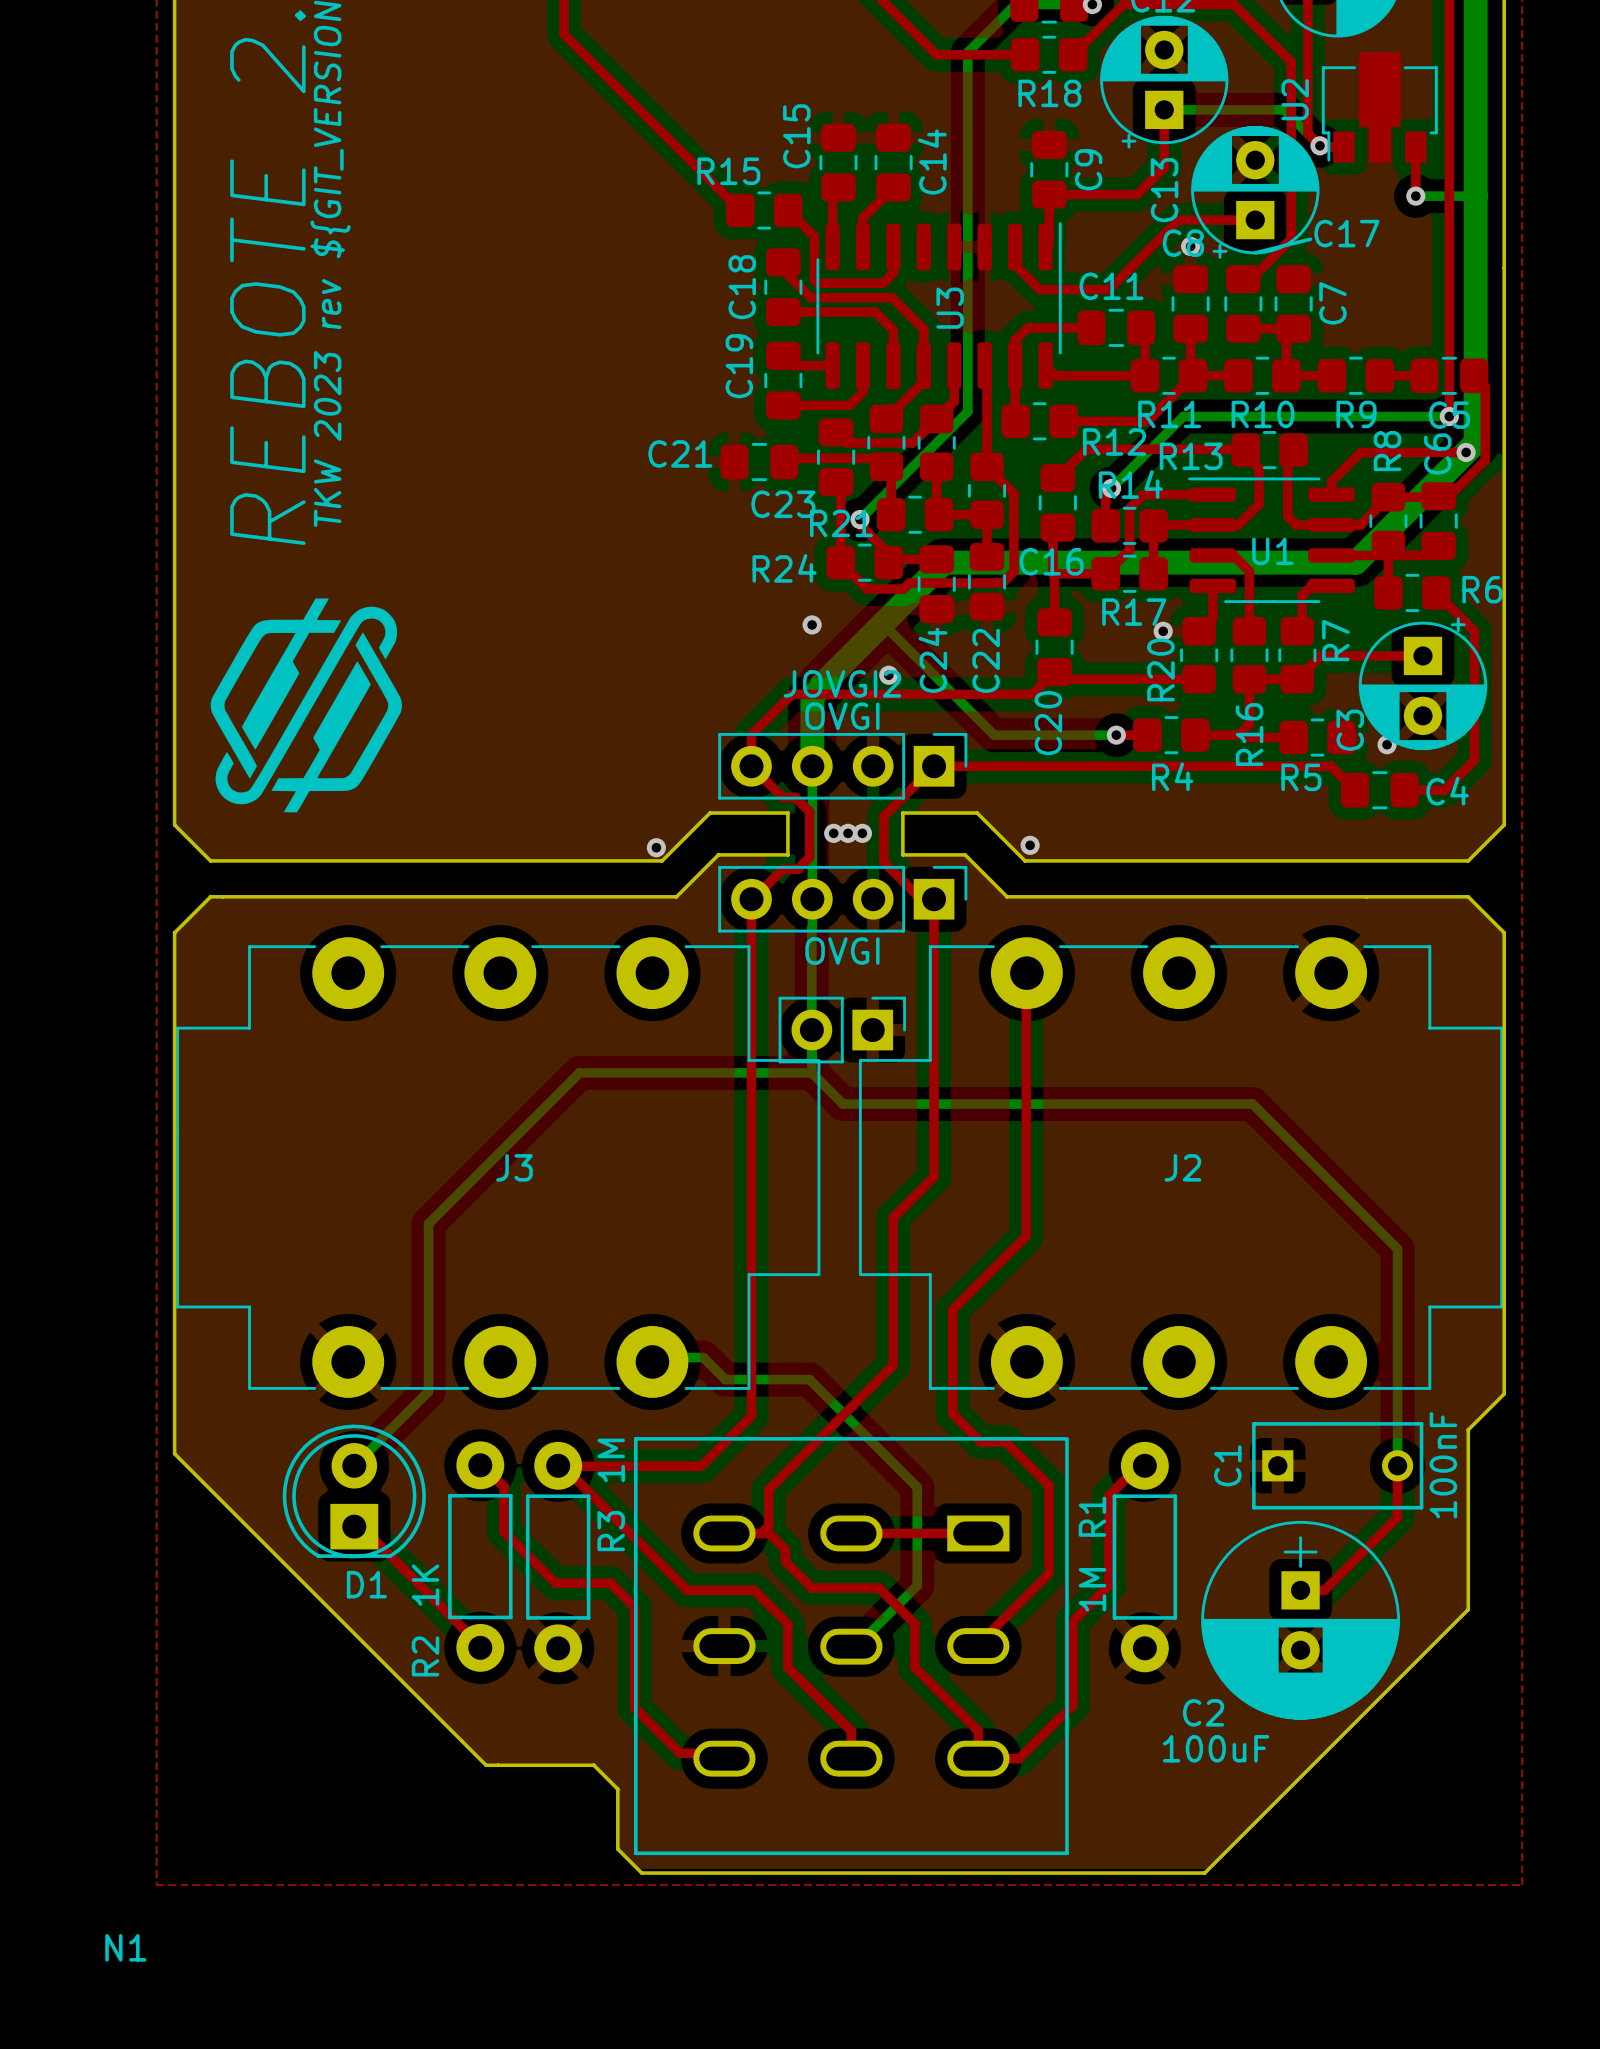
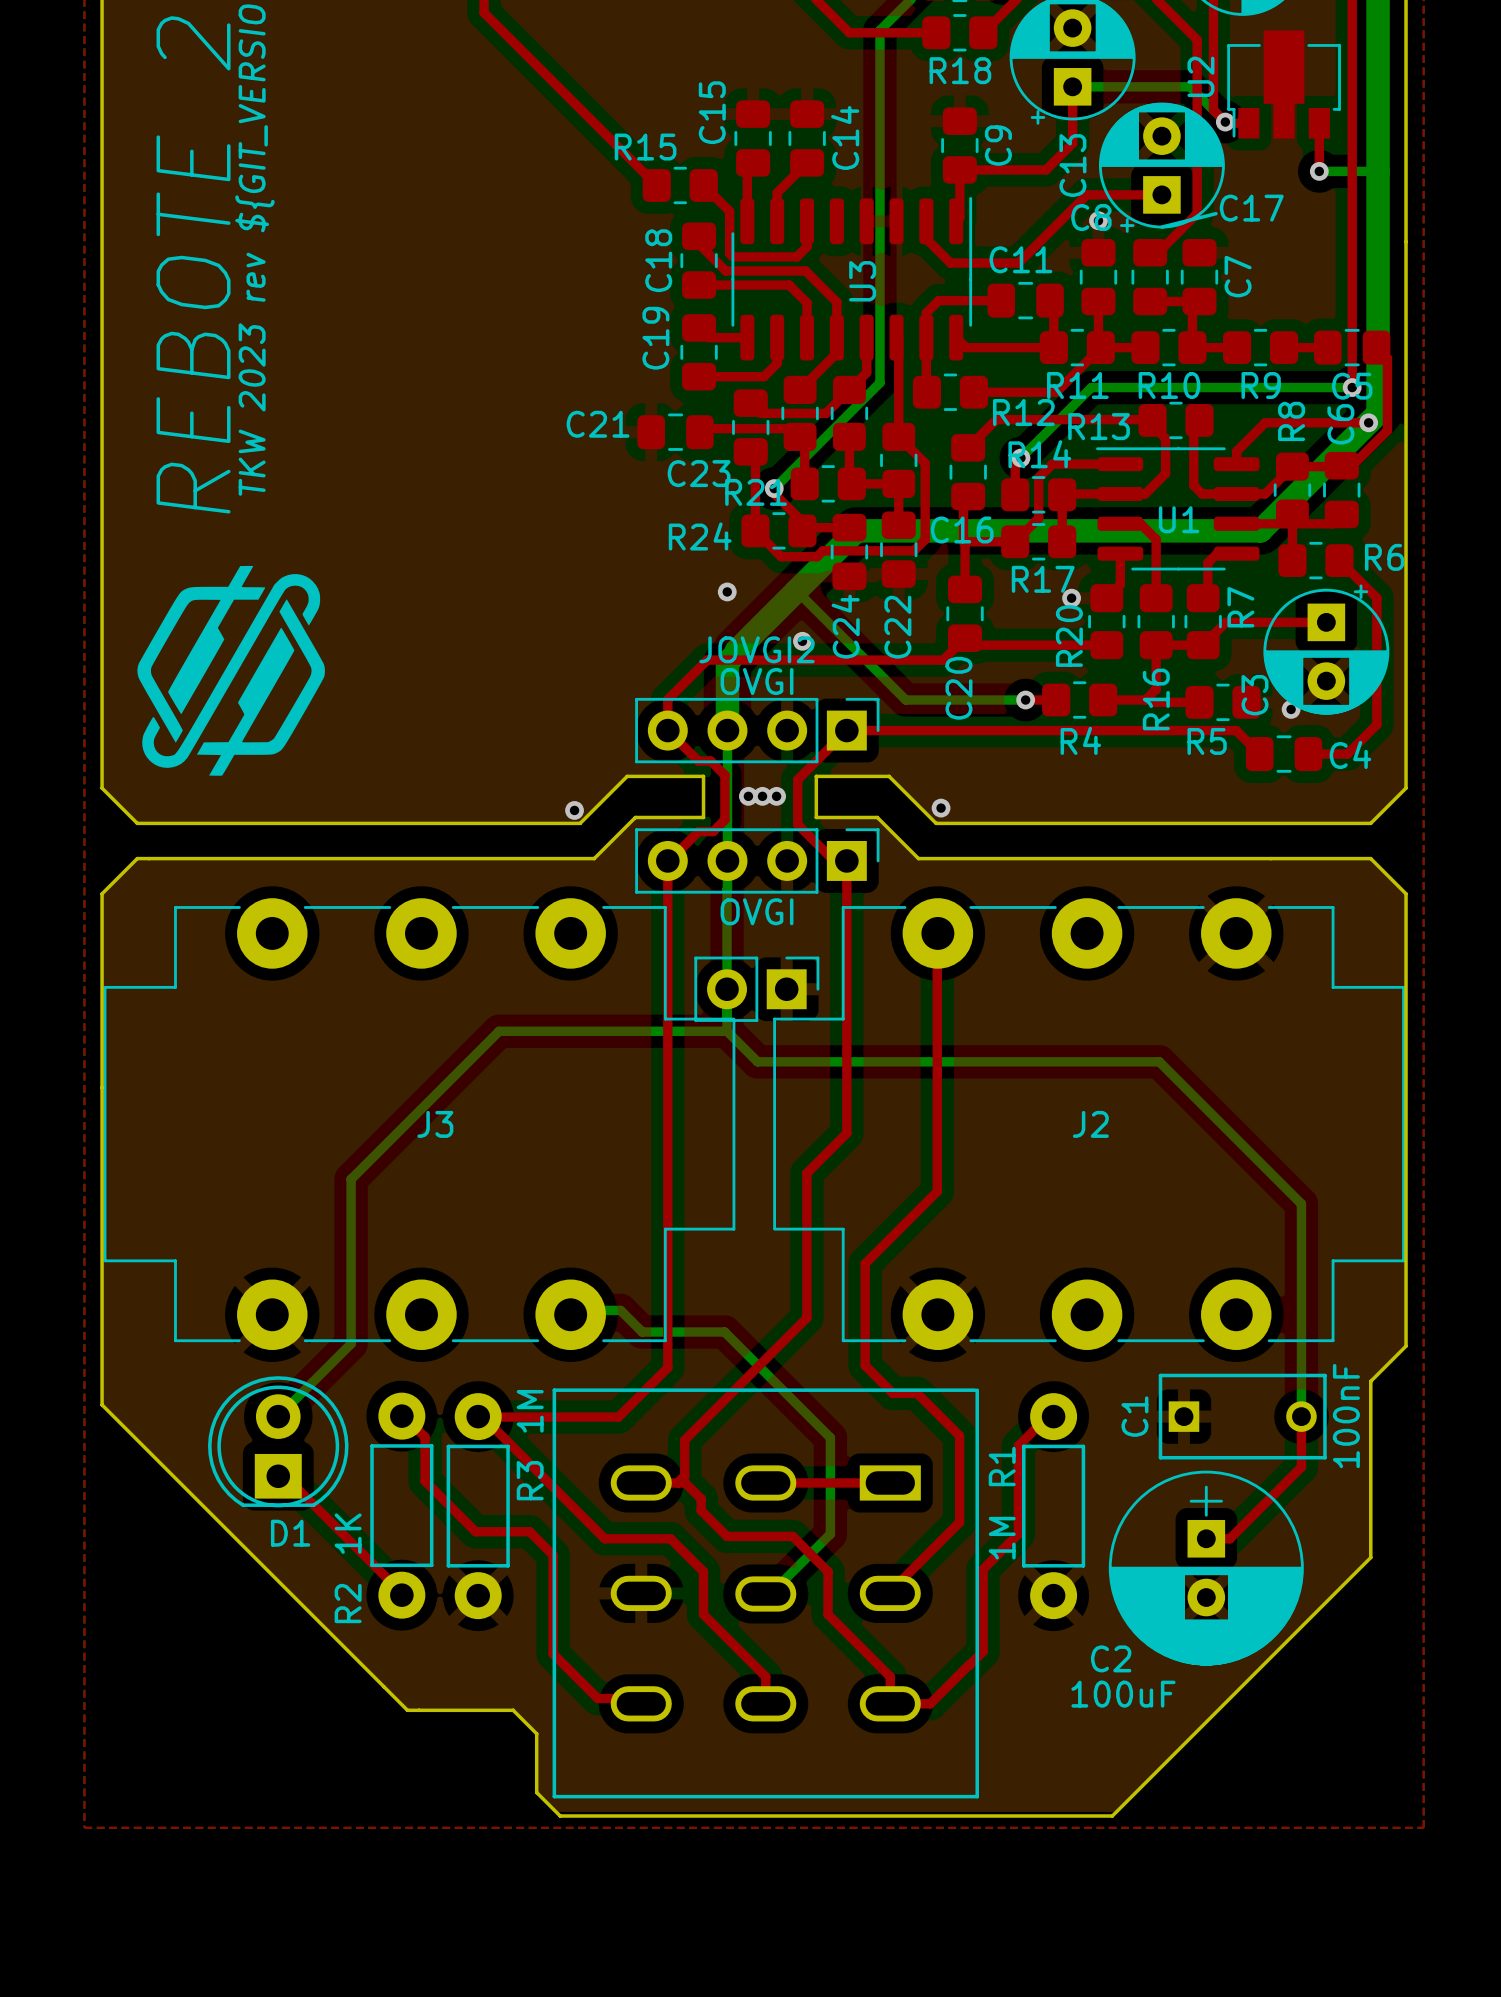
N1: (125, 1947) -> none

